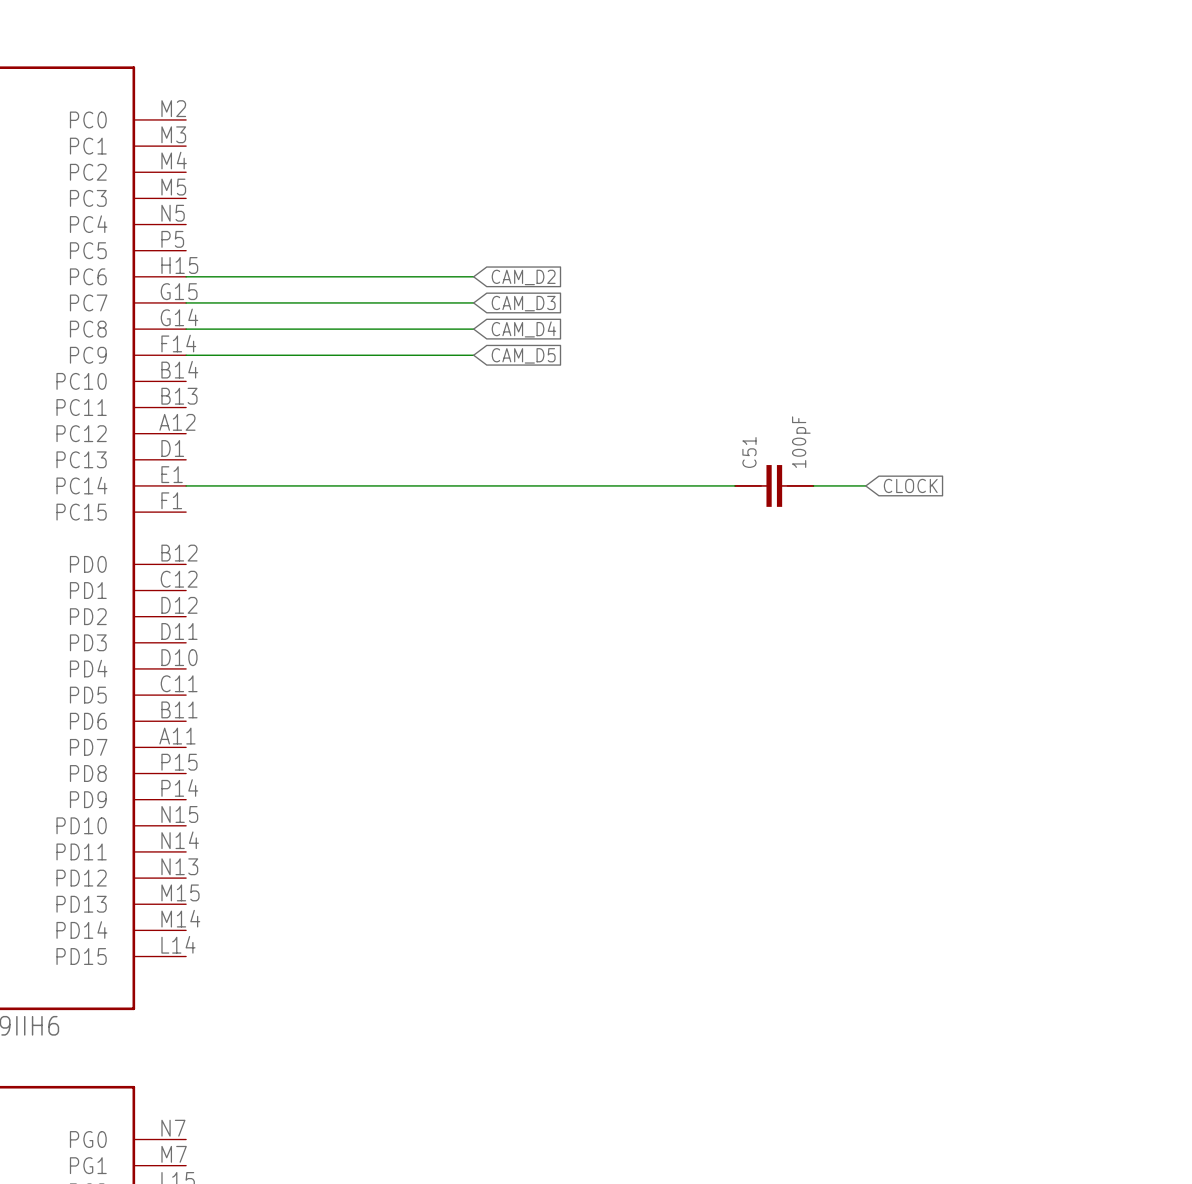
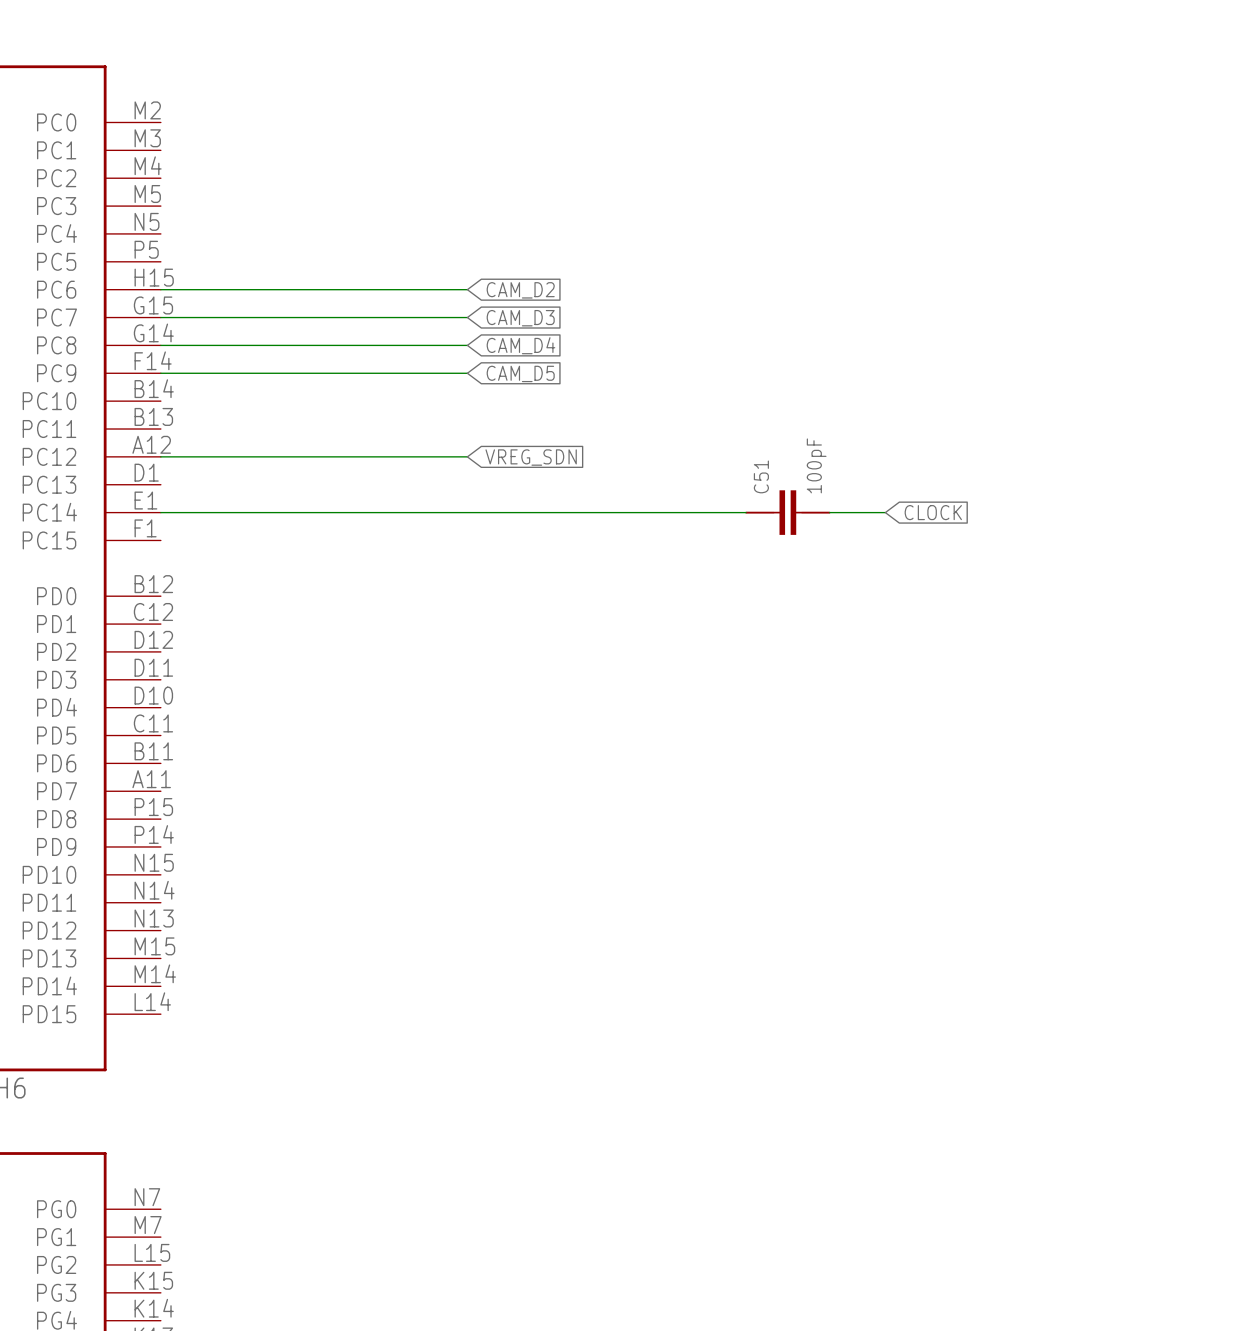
wire: none -> (160, 456) (467, 456)
global label: none -> VREG_SDN (531, 457)

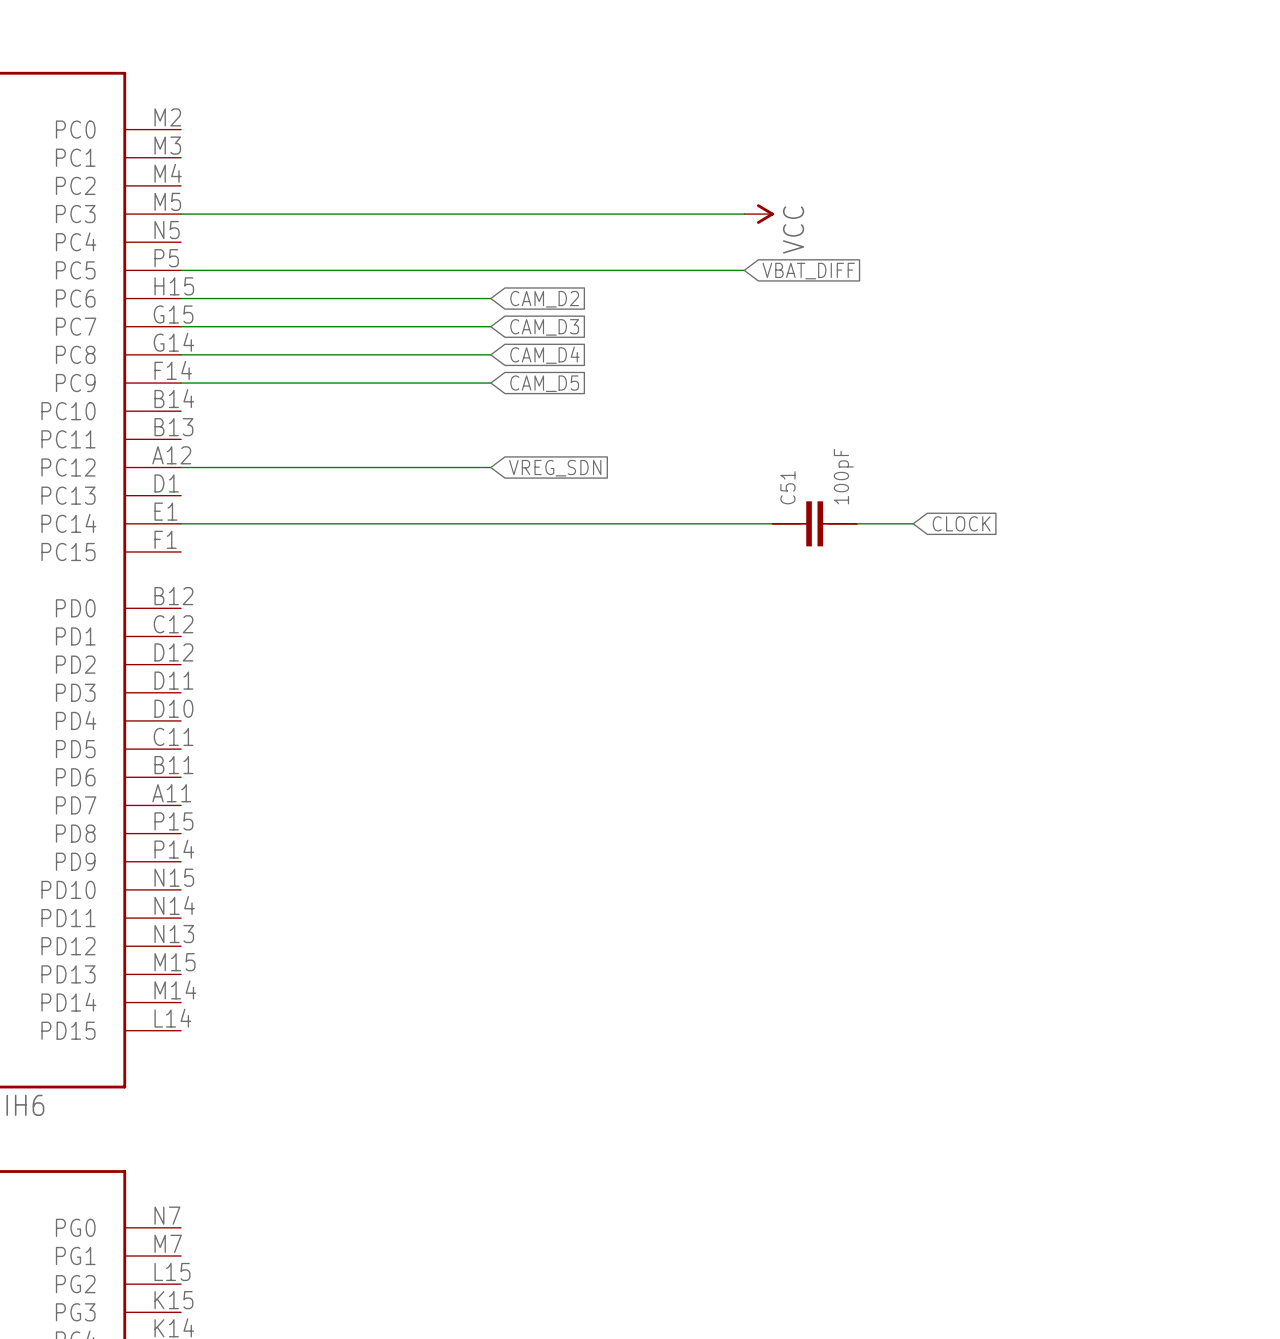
wire: none -> (181, 214) (744, 214)
power symbol: none -> VCC (759, 214)
wire: none -> (181, 270) (744, 270)
global label: none -> VBAT_DIFF (808, 271)

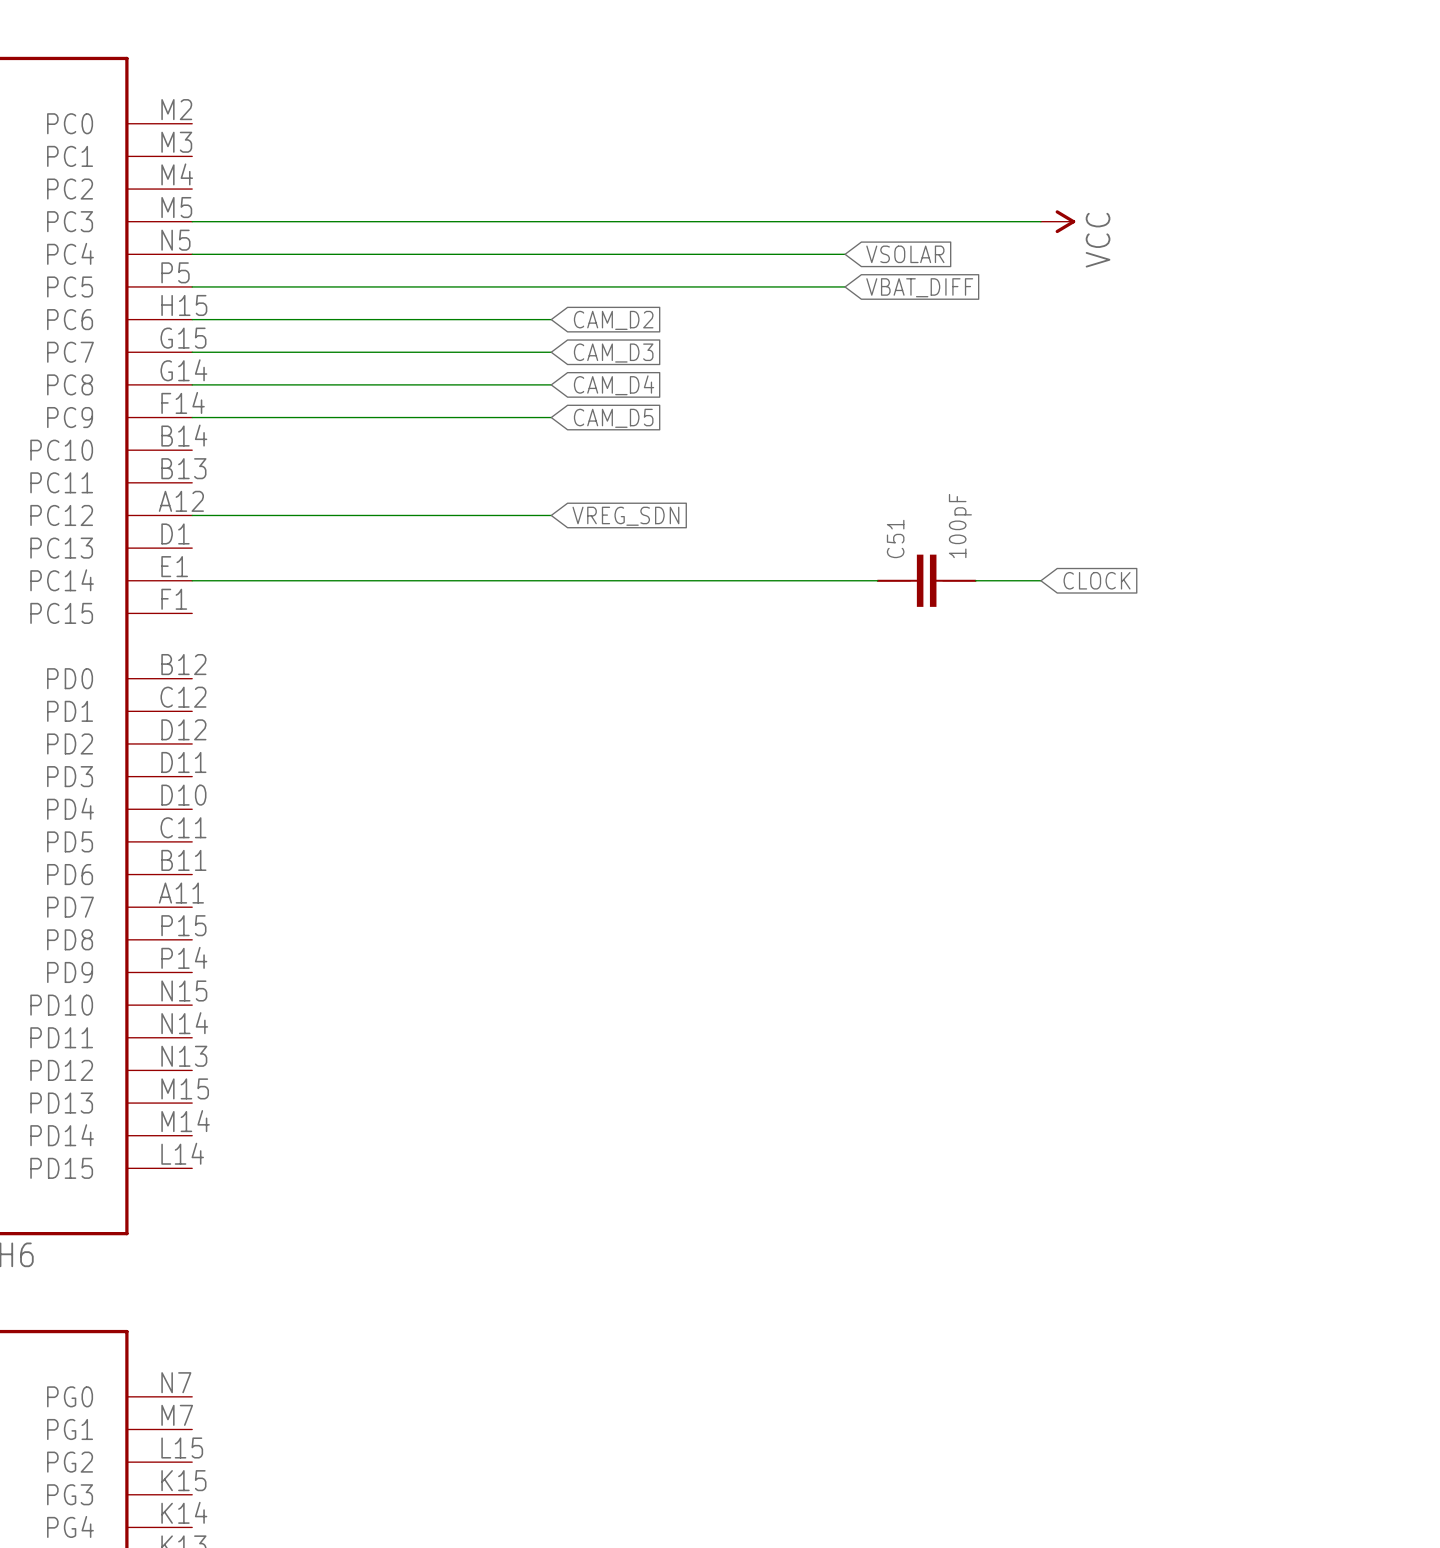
wire: none -> (845, 221) (1040, 221)
power symbol position: VCC (759, 214) -> VCC (1058, 221)
wire: none -> (192, 254) (845, 254)
global label: none -> VSOLAR (905, 254)

